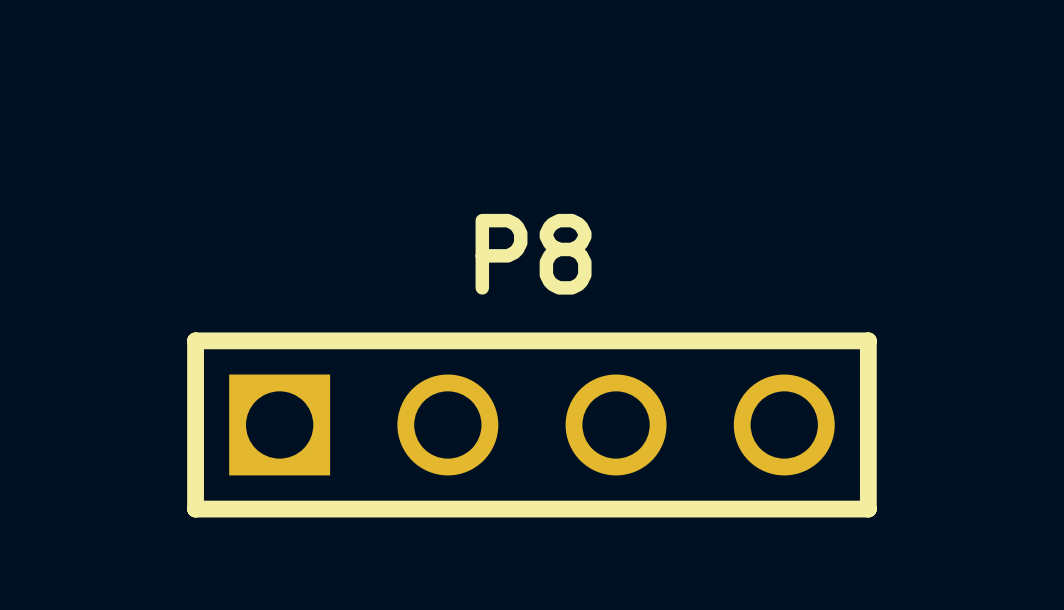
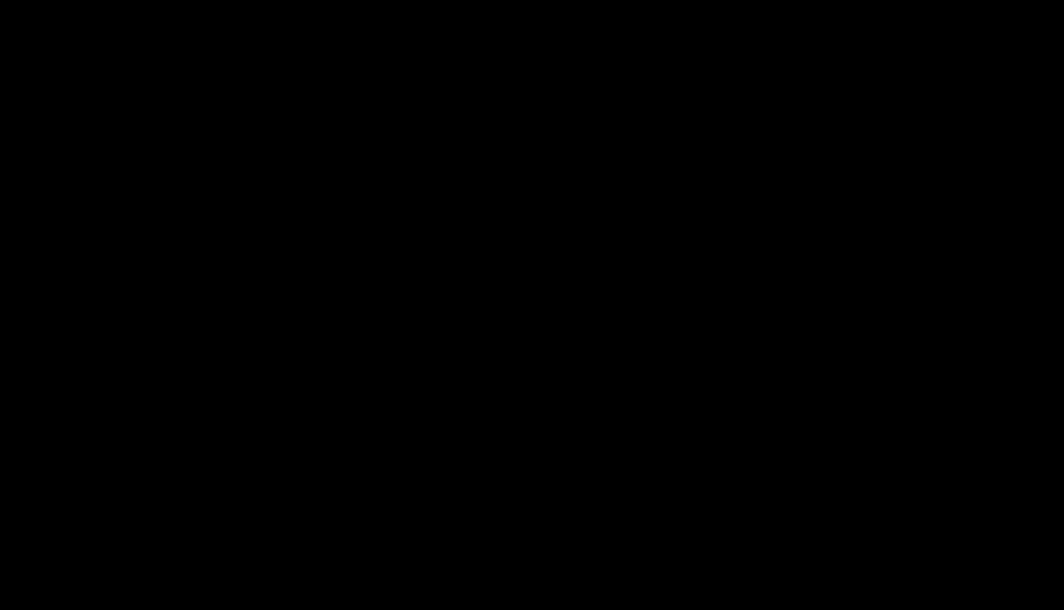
P8: (531, 424) -> none

